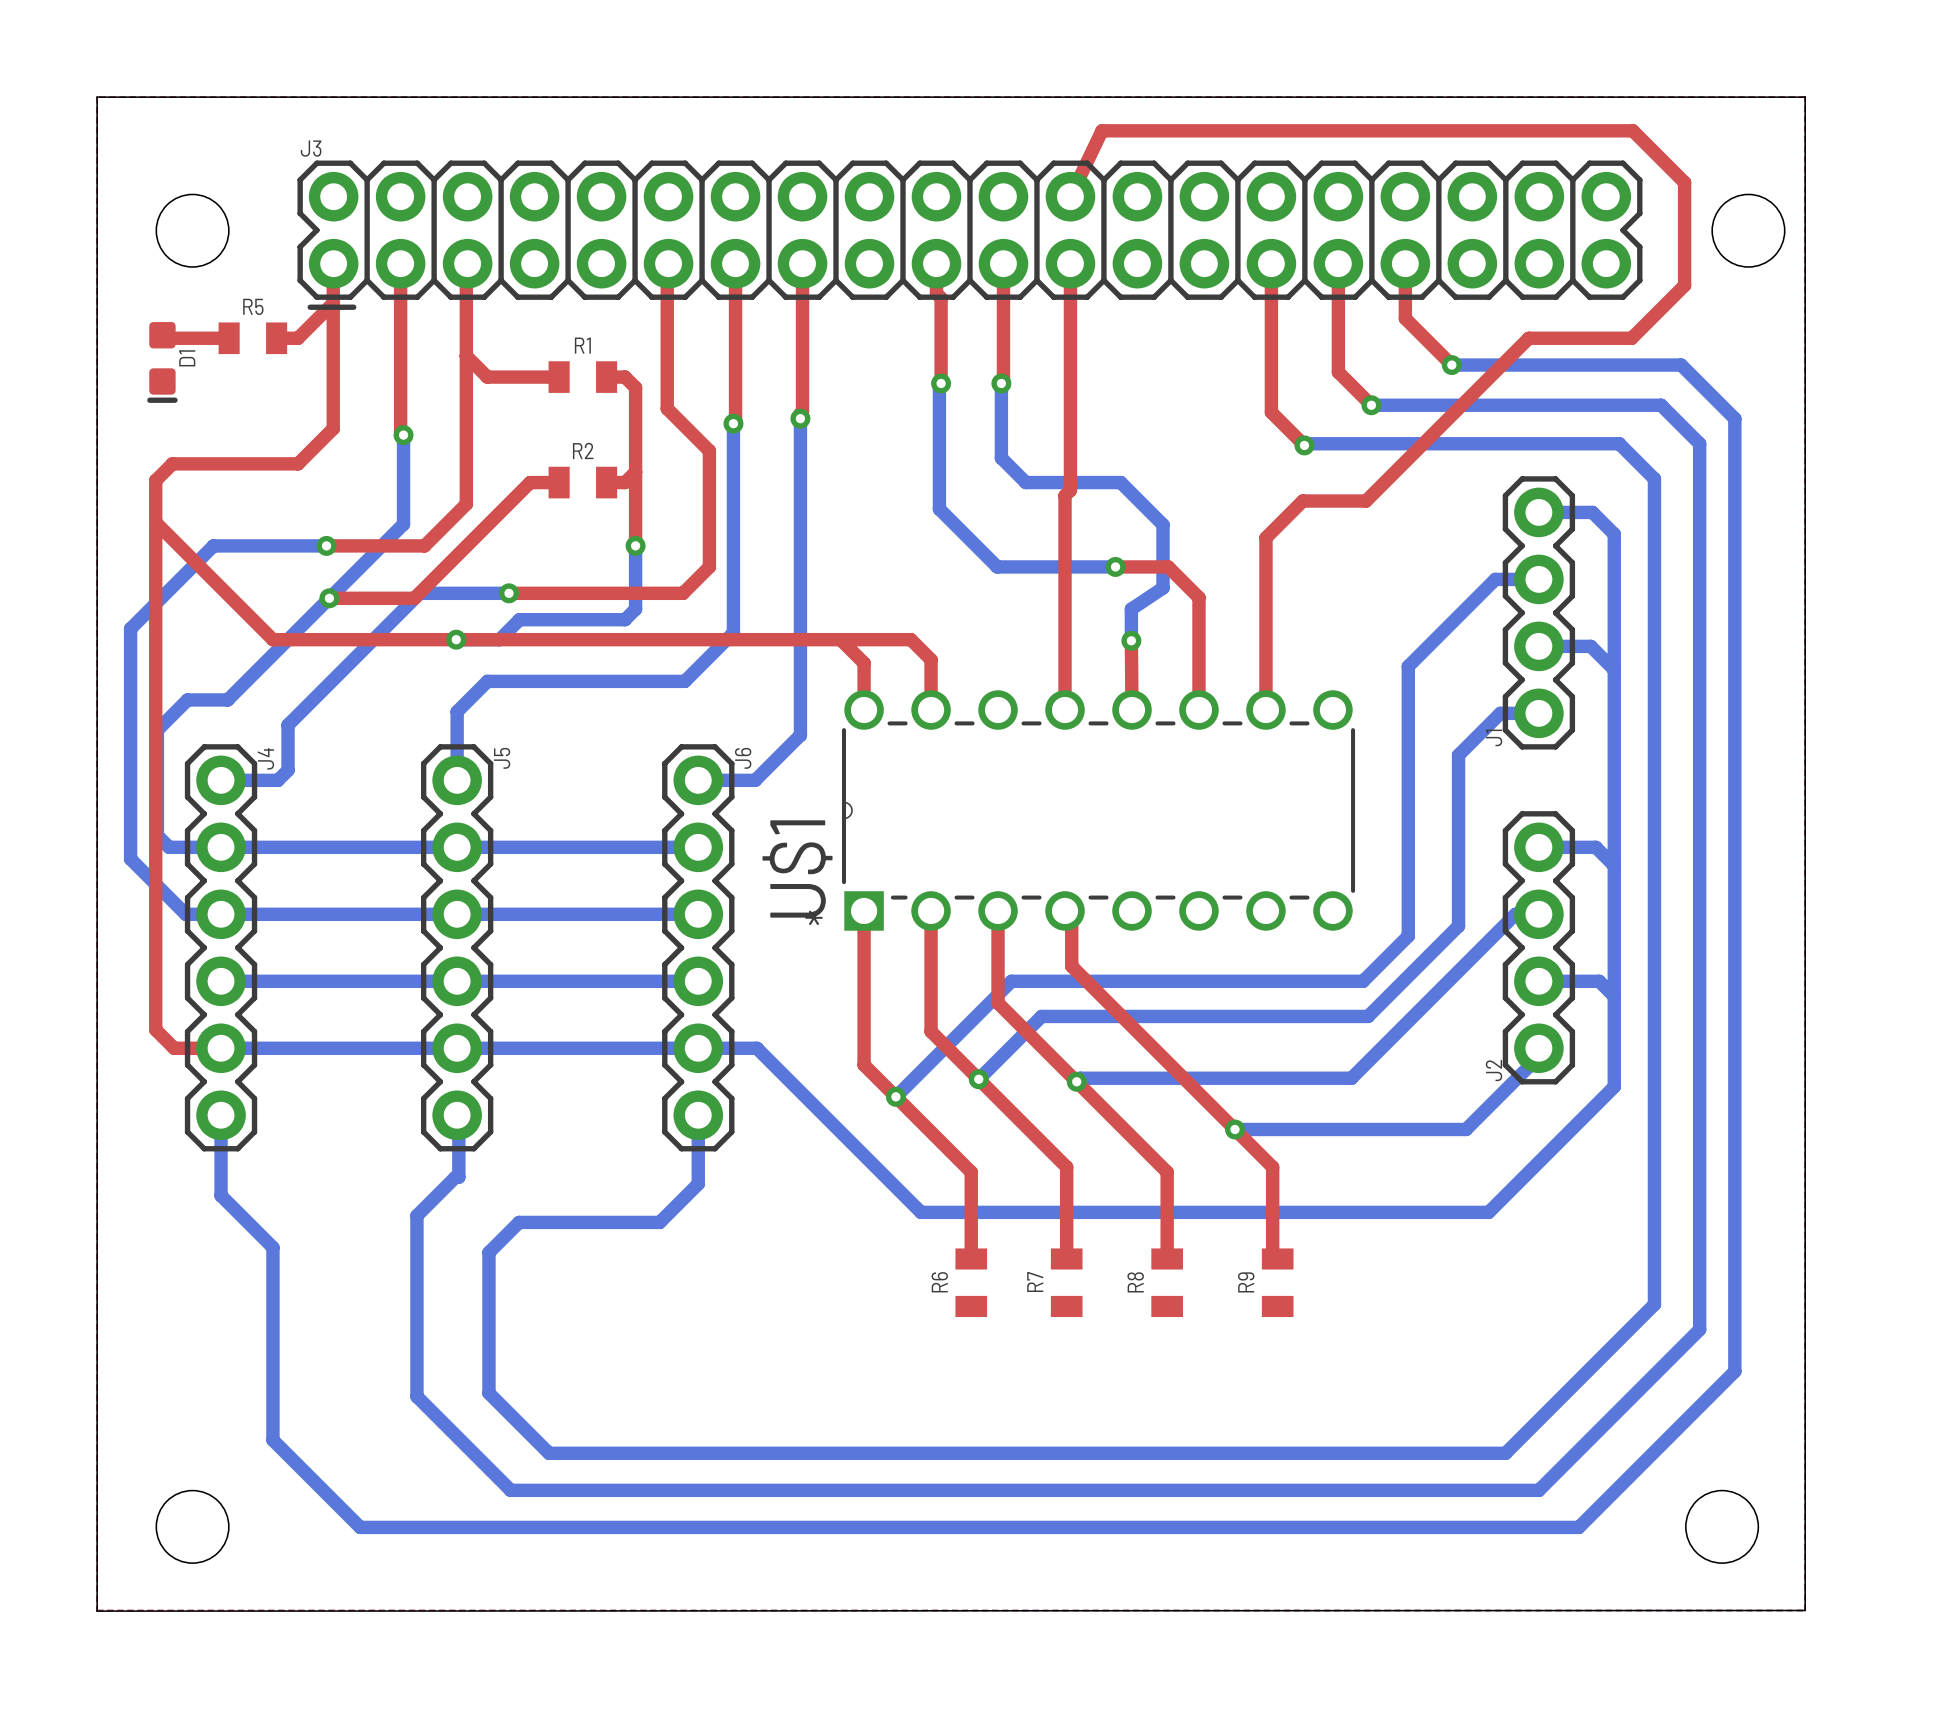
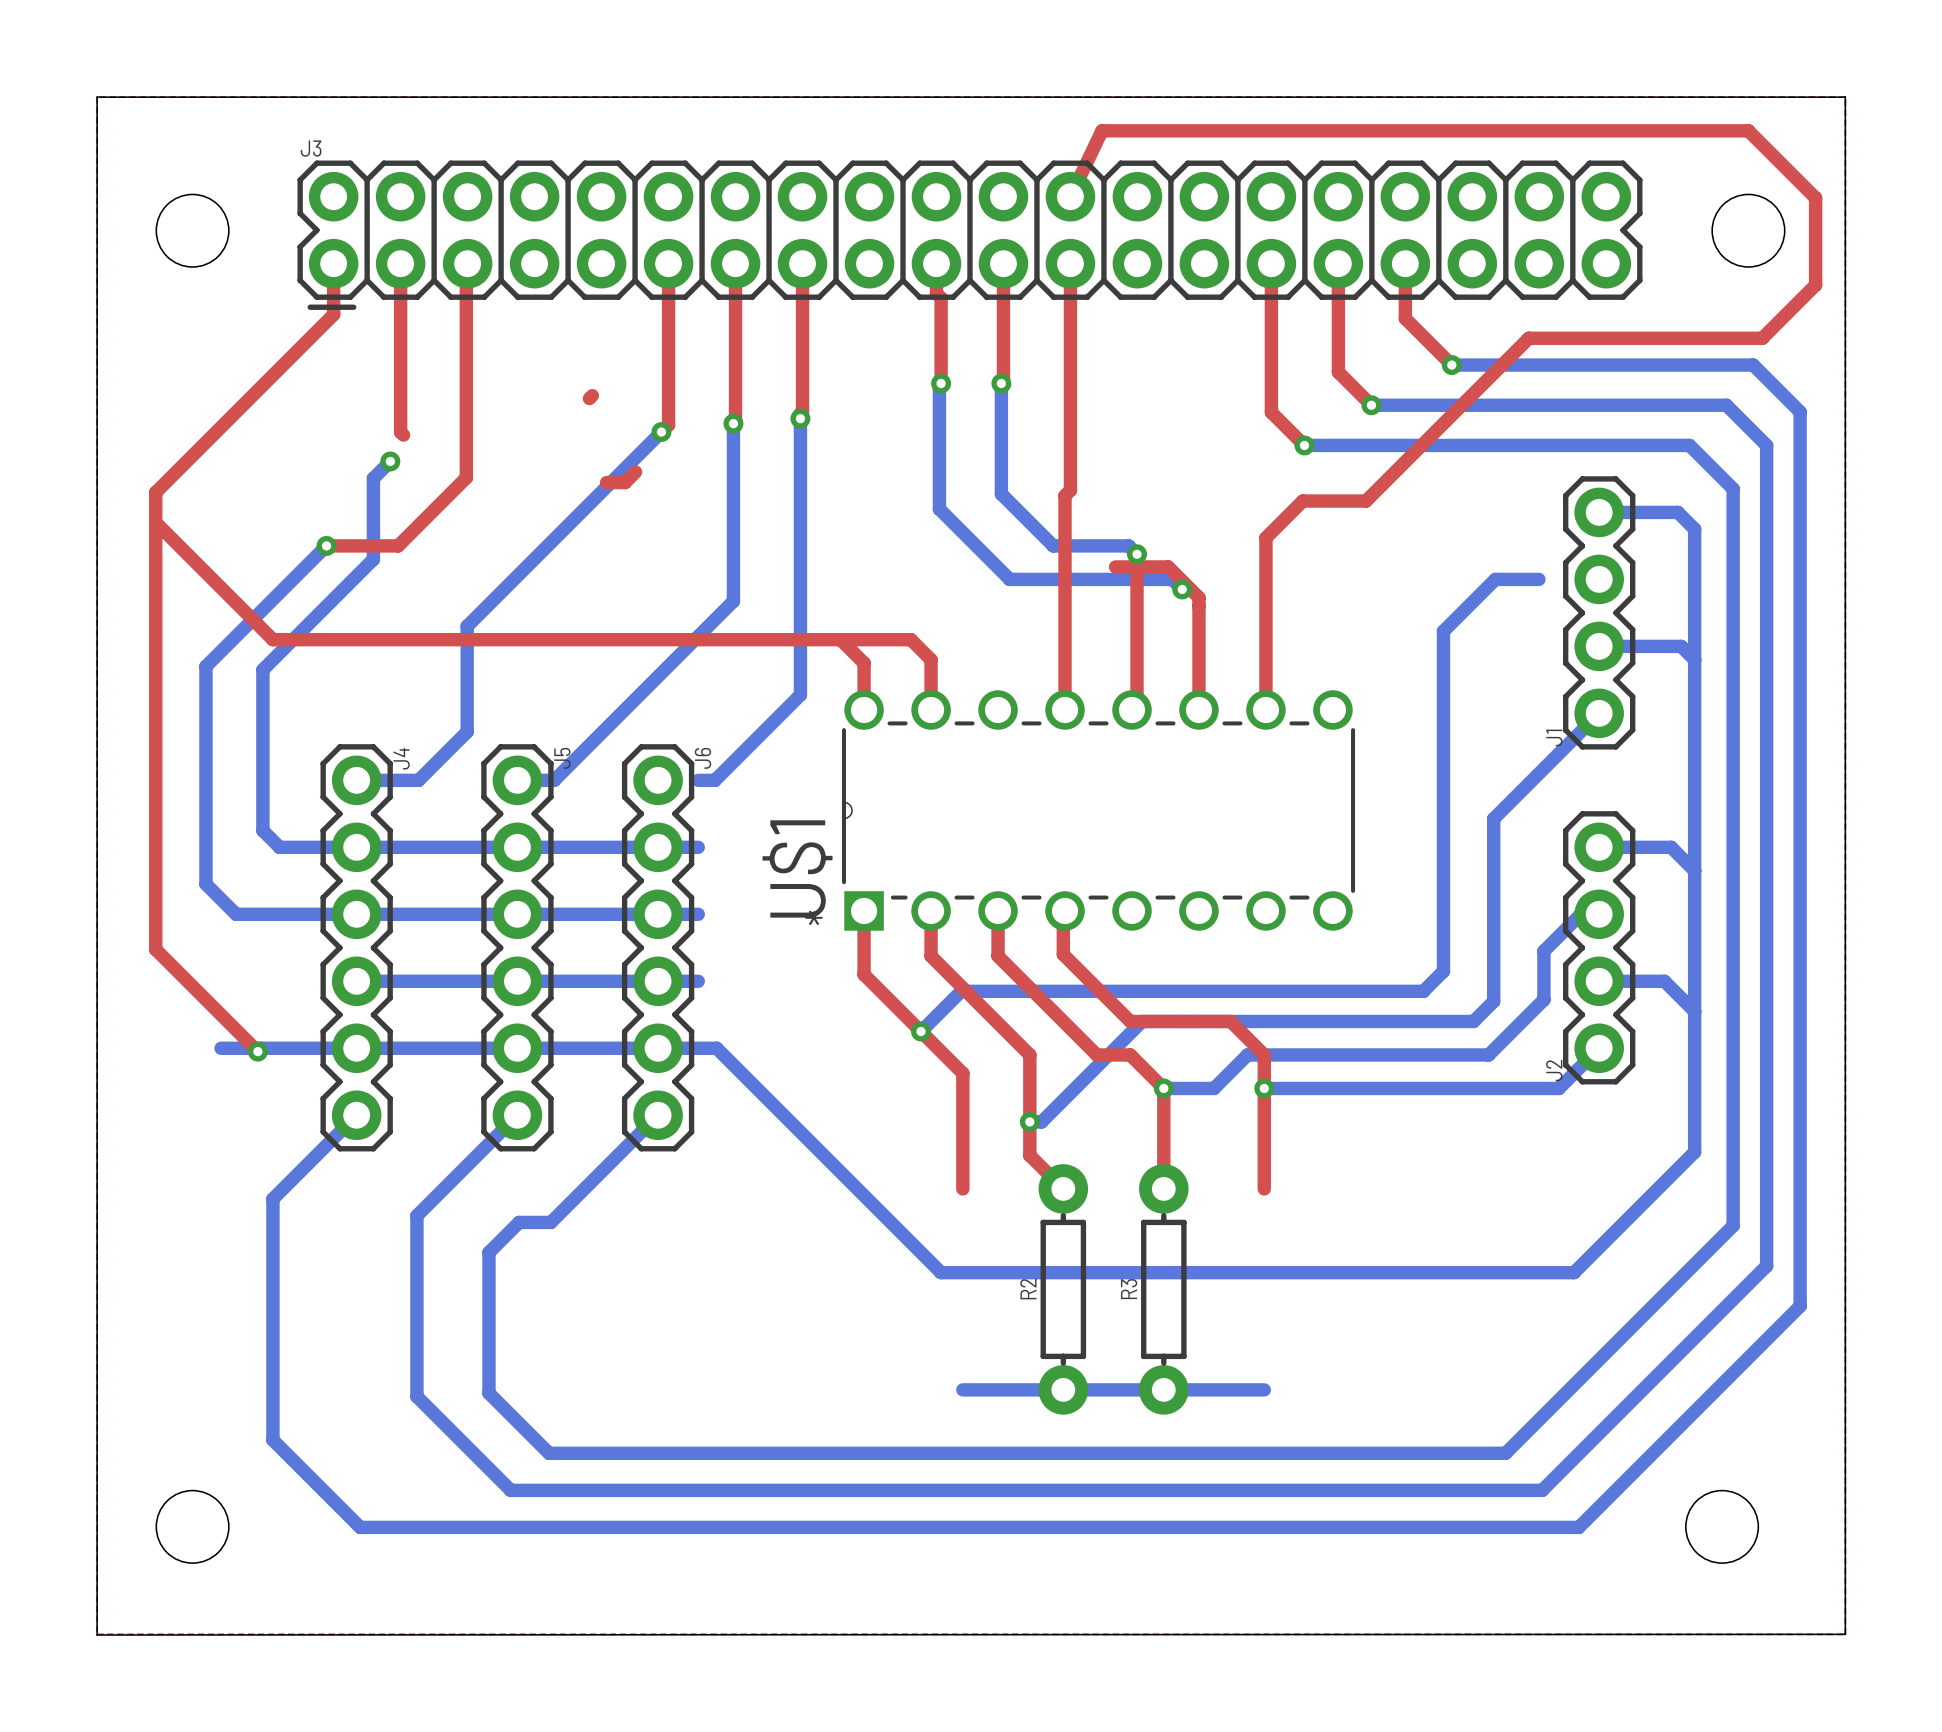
board edge: (1805, 97) (1805, 1610) (97, 1611) -> (1805, 97) (1845, 97) (1845, 1634) (97, 1634) (97, 1611)
top track: (1632, 130) (1684, 182) (1684, 285) (1631, 338) -> (1632, 130) (1748, 130) (1815, 198) (1815, 285) (1762, 338) (1631, 338)
top track: (333, 263) (333, 428) (298, 463) (172, 463) (155, 480) (155, 492) -> (333, 263) (333, 314) (155, 492)
top track: (668, 263) (667, 408) (709, 450) (709, 566) (683, 593) (509, 593) -> (668, 263) (668, 424) (661, 432)
top track: (333, 303) (298, 338) (276, 338) -> none
top track: (162, 335) (165, 338) (229, 338) -> none
R5: (252, 338) -> none
top track: (466, 355) (487, 377) (559, 377) -> none
D1: (162, 362) -> none
bottom track: (1681, 365) (1734, 418) (1734, 1371) -> (1681, 365) (1753, 365) (1800, 411) (1800, 1306) (1734, 1371)
R1: (582, 377) -> none
top track: (606, 377) (625, 377) (635, 387) (635, 545) -> none
top track: none -> (592, 395) (589, 398)
bottom track: (1661, 405) (1699, 443) (1699, 1329) (1538, 1490) -> (1661, 405) (1726, 405) (1766, 445) (1766, 1265) (1542, 1490) (1538, 1490)
bottom track: none -> (661, 432) (467, 626) (467, 731) (418, 780) (356, 780)
via: none -> (661, 432)
bottom track: (403, 435) (403, 524) (227, 699) (187, 699) (157, 730) (157, 835) (169, 847) (279, 847) -> (390, 461) (373, 478) (373, 559) (262, 669) (262, 830) (279, 847)
via position: (403, 435) -> (390, 461)
bottom track: (1304, 445) (1306, 443) (1619, 443) (1654, 478) (1654, 1304) -> (1304, 445) (1689, 445) (1733, 488) (1733, 1225) (1654, 1304)
bottom track: (1001, 458) (1025, 482) (1120, 482) (1163, 524) (1163, 588) (1131, 609) (1131, 640) -> (1001, 458) (1001, 494) (1053, 545) (1128, 545) (1137, 554)
R2 footprint: [548, 466, 618, 499] -> [1038, 1164, 1089, 1415]
top track: (466, 477) (466, 504) (424, 545) (398, 545) -> (466, 477) (398, 545)
top track: (559, 482) (530, 482) (414, 598) (329, 598) -> none
bottom track: (1538, 512) (1592, 512) (1614, 534) (1614, 1086) (1488, 1212) (921, 1212) (756, 1048) (716, 1048) -> (1599, 512) (1677, 512) (1694, 529) (1694, 1152) (1574, 1272) (941, 1272) (716, 1048)
bottom track: (326, 545) (213, 545) (130, 628) (130, 859) (185, 914) (236, 914) -> (326, 545) (205, 666) (205, 884) (236, 914)
bottom track: (635, 545) (635, 609) (625, 619) (519, 619) (499, 639) (456, 639) -> none
via: (635, 545) -> none
bottom track: (997, 566) (1115, 566) -> (997, 566) (1009, 579) (1172, 579) (1182, 589)
via position: (1115, 566) -> (1137, 554)
via: none -> (1182, 589)
bottom track: (509, 593) (419, 593) (288, 725) (288, 770) (277, 780) (221, 780) -> none
via: (509, 593) -> none
via: (329, 598) -> none
bottom track: (733, 601) (733, 632) (684, 681) (487, 681) (457, 711) (457, 780) -> (733, 601) (554, 780) (517, 780)
J1 position: (1538, 612) -> (1599, 612)
bottom track: (1443, 631) (1408, 666) (1408, 936) (1363, 981) (1011, 981) (895, 1096) -> (1443, 631) (1443, 971) (1423, 991) (961, 991) (921, 1031)
via: (456, 639) -> none
top track: (1131, 640) (1132, 710) -> (1137, 554) (1137, 704) (1132, 710)
via: (1131, 640) -> none
bottom track: (1538, 646) (1590, 646) (1614, 669) -> none
bottom track: none -> (1599, 646) (1681, 646) (1694, 659)
bottom track: (800, 694) (800, 735) (755, 780) (715, 780) -> (800, 694) (715, 780)
bottom track: (1538, 713) (1500, 713) (1458, 755) (1458, 926) (1368, 1016) (1041, 1016) (978, 1079) -> none
bottom track: none -> (1599, 713) (1493, 818) (1493, 1001) (1473, 1021) (1142, 1021) (1041, 1121) (1029, 1121)
bottom track: (1538, 847) (1595, 847) (1614, 865) -> none
bottom track: none -> (1599, 847) (1671, 847) (1694, 870)
top track: (1063, 912) (1071, 921) (1071, 966) (1272, 1167) (1272, 1253) (1277, 1258) -> (1063, 912) (1063, 954) (1130, 1021) (1230, 1021) (1264, 1054) (1264, 1188)
bottom track: (1538, 914) (1515, 914) (1351, 1078) (1080, 1078) (1076, 1081) -> none
bottom track: none -> (1599, 914) (1580, 914) (1543, 951) (1543, 999) (1488, 1054) (1247, 1054) (1214, 1088) (1163, 1088)
J4 position: (221, 947) -> (356, 947)
J5 position: (457, 947) -> (517, 947)
J6 position: (698, 947) -> (658, 947)
J2 position: (1538, 947) -> (1599, 947)
top track: (155, 949) (155, 1029) (174, 1048) (221, 1048) -> (155, 949) (257, 1051)
top track: (931, 956) (931, 1031) (1066, 1167) (1066, 1258) -> (931, 956) (1029, 1054) (1029, 1155) (1063, 1188)
top track: (998, 956) (998, 1003) (1167, 1172) (1167, 1258) -> (998, 956) (1096, 1054) (1130, 1054) (1163, 1088) (1163, 1188)
top track: (864, 974) (864, 1065) (971, 1172) (971, 1258) -> (864, 974) (962, 1073) (962, 1188)
bottom track: (221, 981) (356, 981) -> none
bottom track: (1538, 981) (1599, 981) (1614, 996) -> none
bottom track: none -> (1599, 981) (1664, 981) (1694, 1011)
via: none -> (921, 1031)
bottom track: (1538, 1048) (1538, 1056) (1466, 1129) (1234, 1129) -> none
bottom track: none -> (1599, 1048) (1558, 1088) (1264, 1088)
via: none -> (257, 1051)
via: (978, 1079) -> none
via: (1076, 1081) -> none
via: none -> (1163, 1088)
via: none -> (1264, 1088)
via: (895, 1096) -> none
bottom track: (221, 1115) (221, 1195) (272, 1247) -> (356, 1115) (272, 1198) (272, 1247)
bottom track: (457, 1115) (458, 1116) (458, 1177) (455, 1177) -> (517, 1115) (455, 1177)
bottom track: (698, 1115) (698, 1183) (659, 1222) (550, 1222) -> (658, 1115) (550, 1222)
via: none -> (1029, 1121)
via: (1234, 1129) -> none
R6: (971, 1282) -> none
R7: (1066, 1282) -> none
R8: (1167, 1282) -> none
R9: (1277, 1282) -> none
R3: none -> (1163, 1289)
bottom track: none -> (962, 1389) (1264, 1389)

